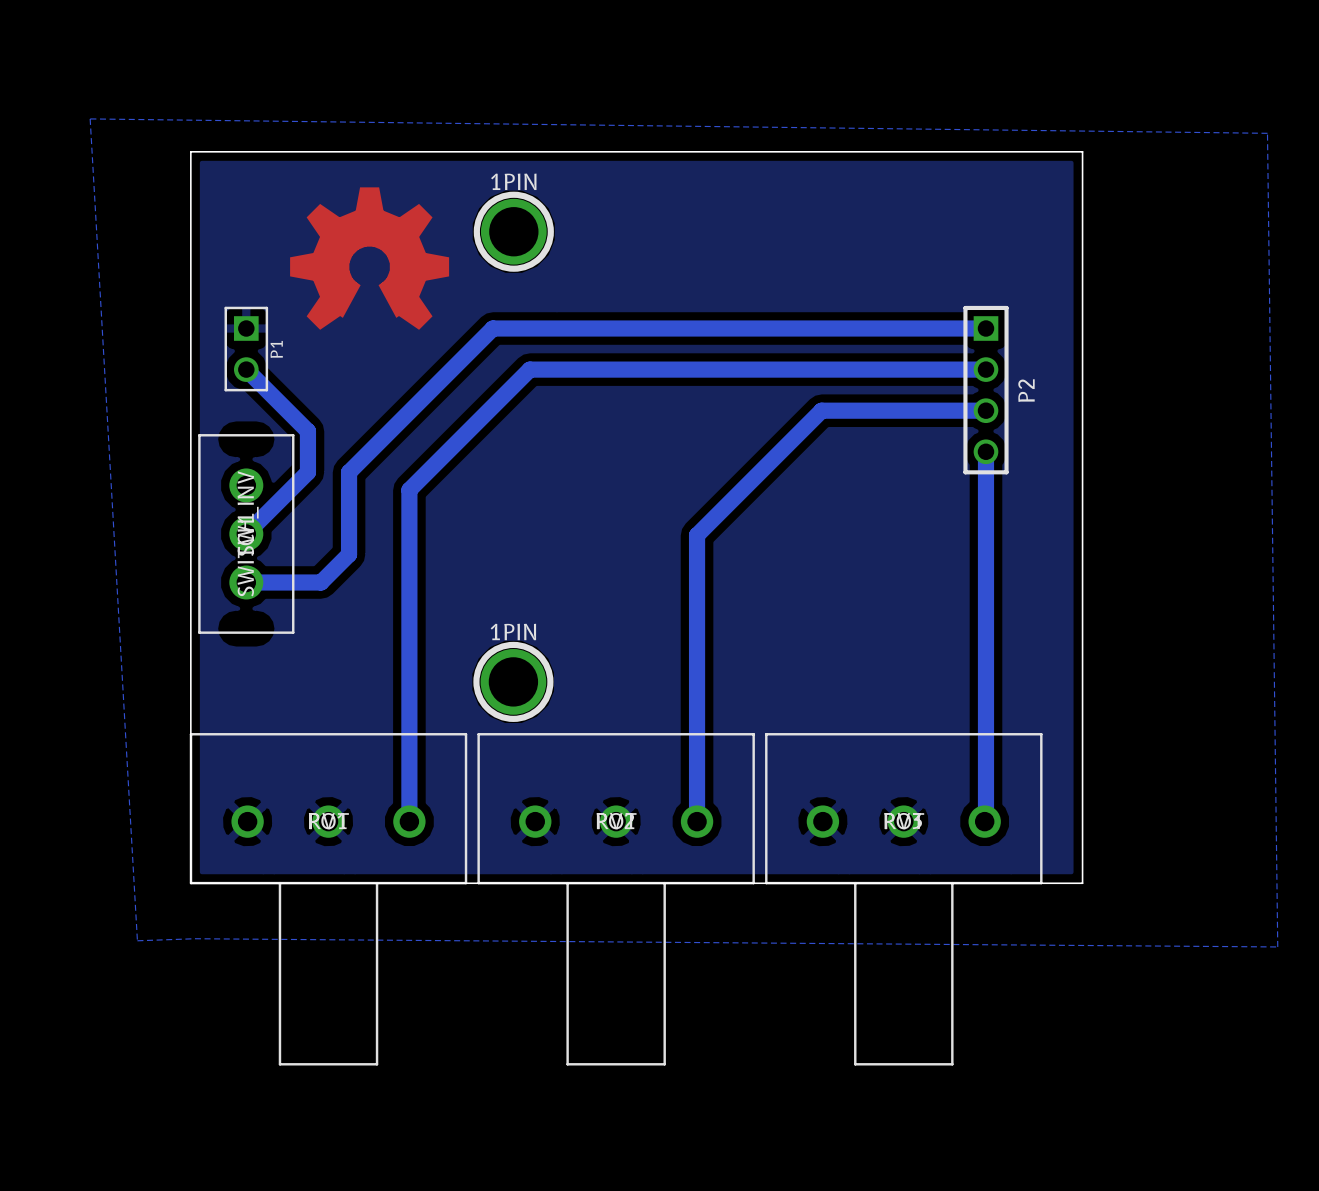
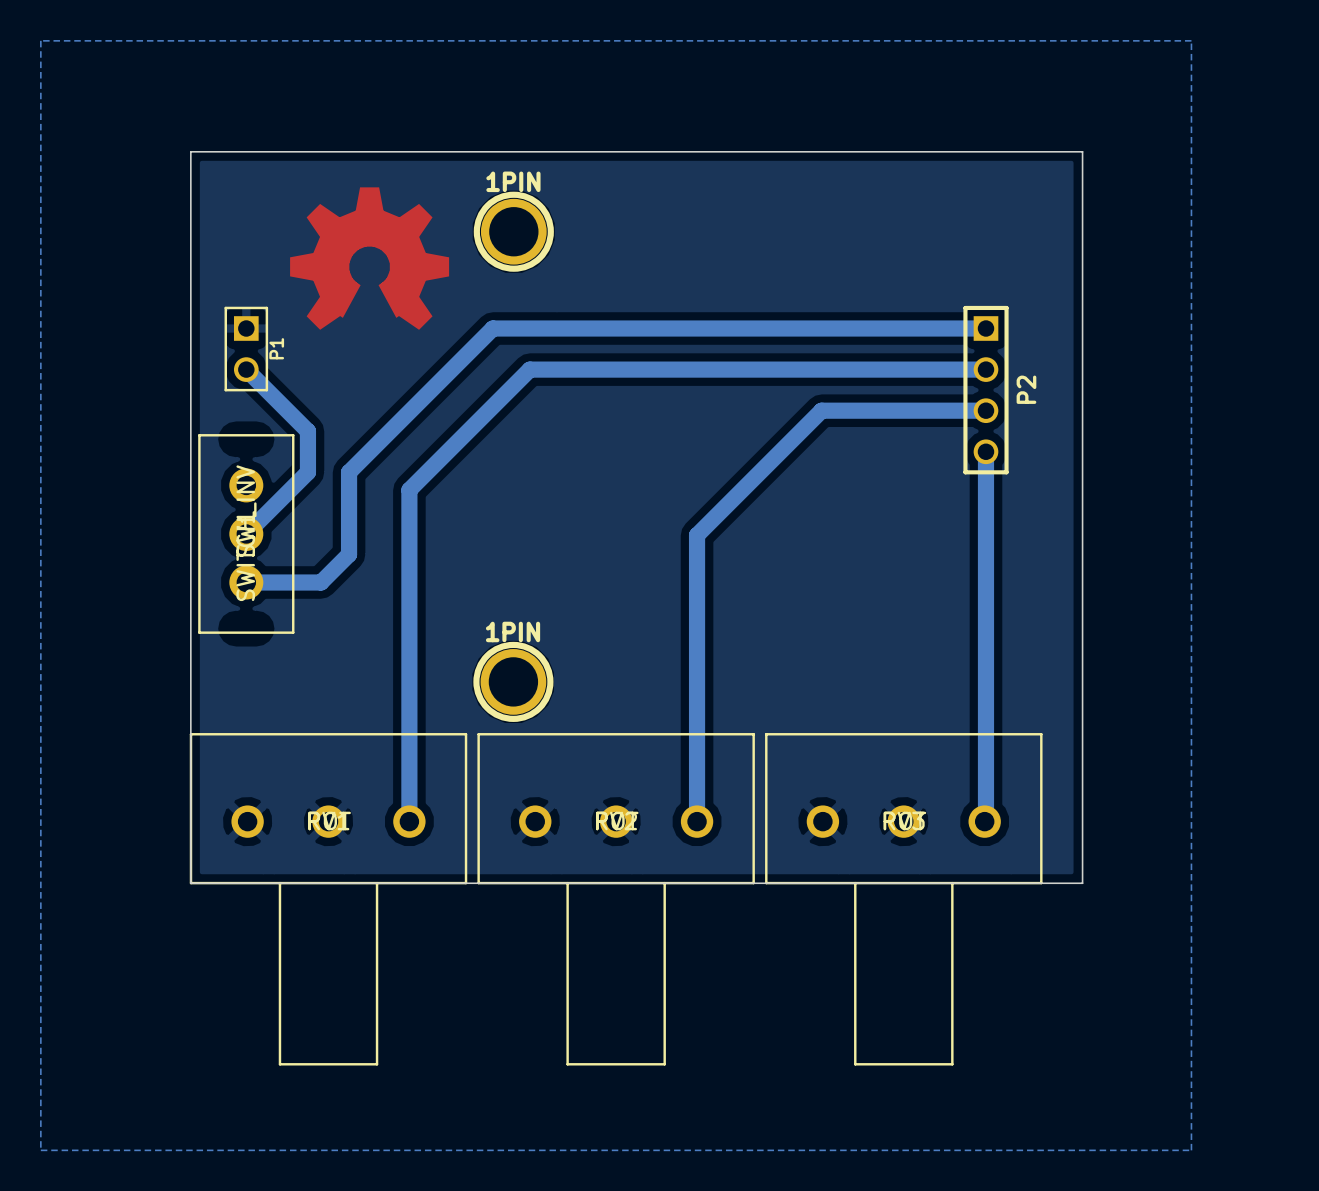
bottom zone outline: (90, 118) (1267, 133) (1277, 946) (194, 938) (137, 940) (90, 118) -> (40, 40) (40, 1150) (1191, 1150) (1191, 40) (40, 40)

